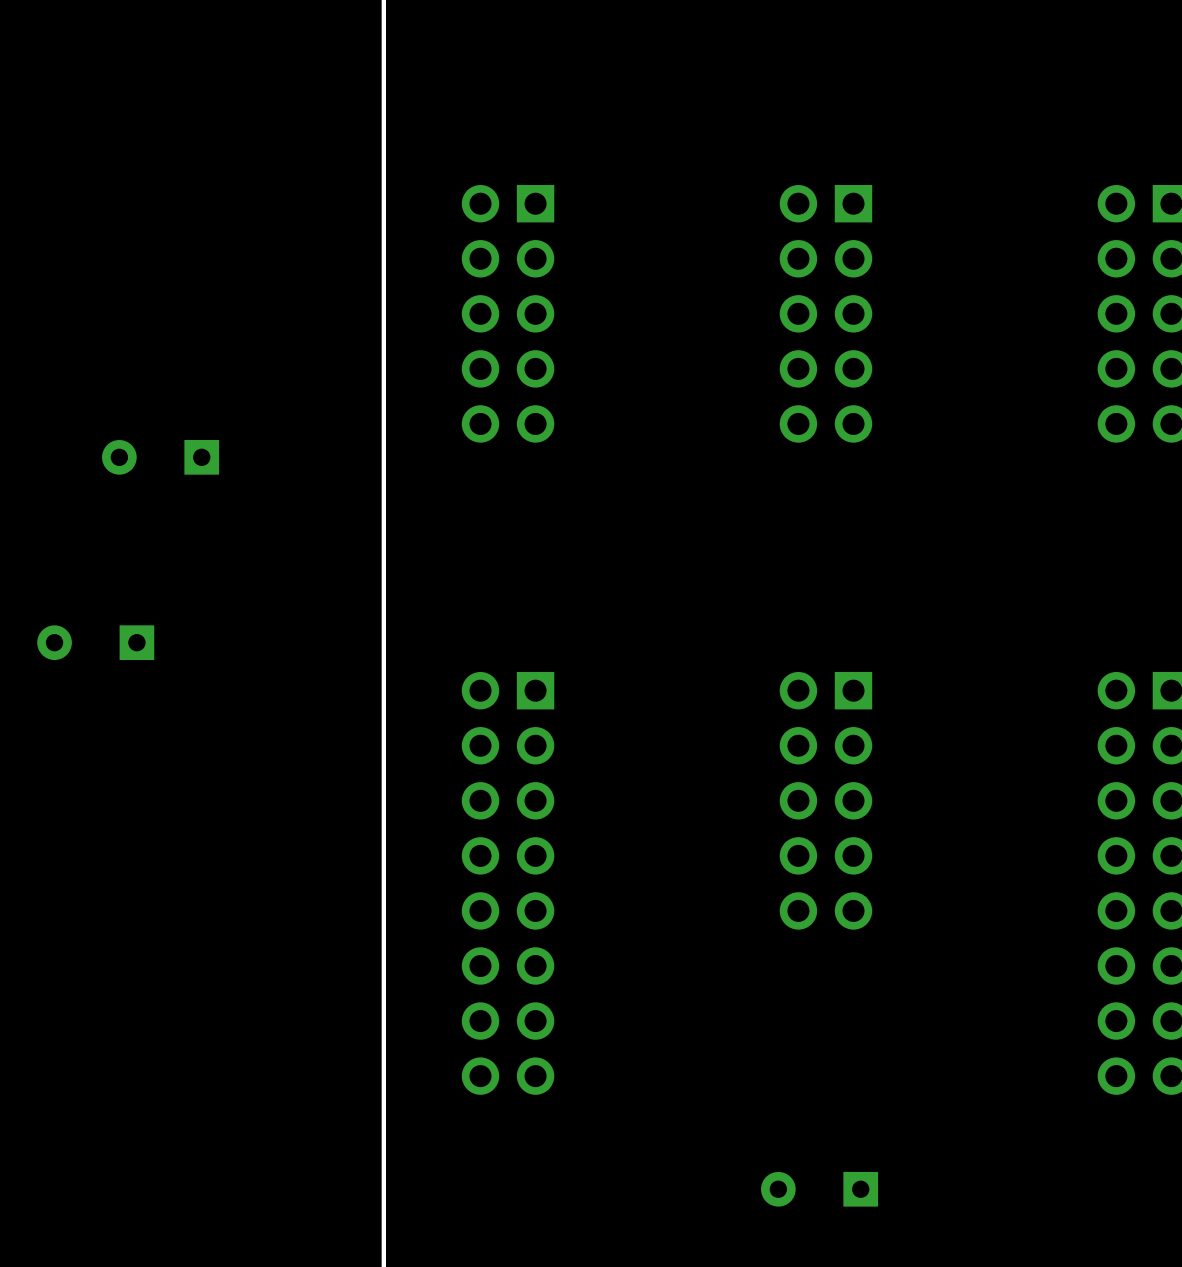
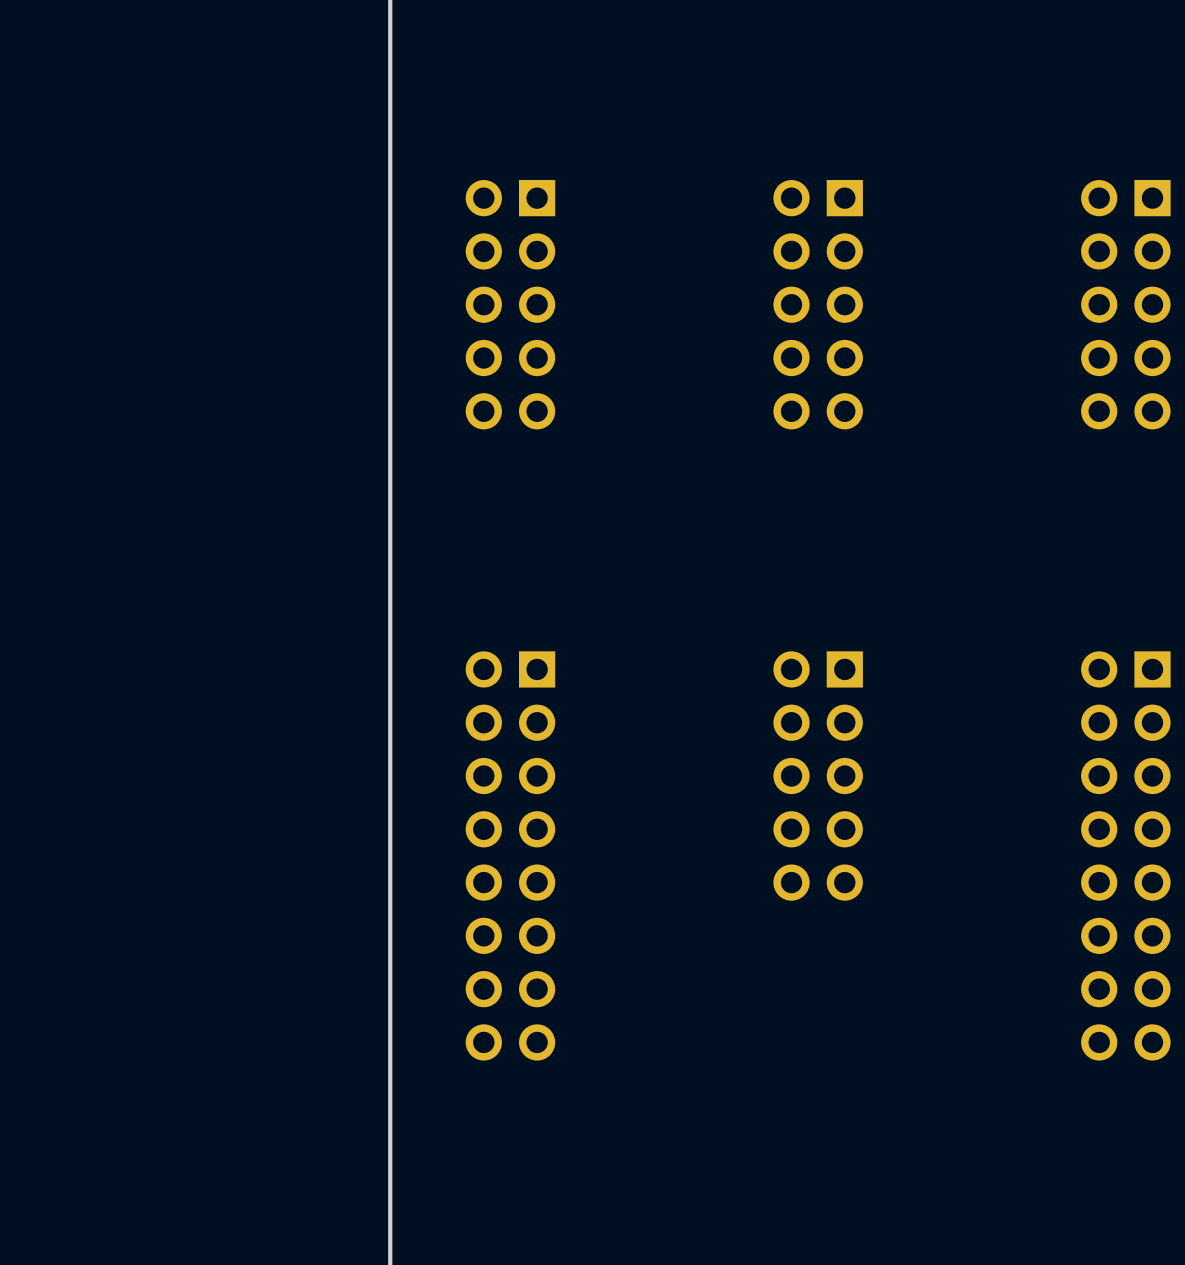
part: (160, 457) -> none
part: (95, 642) -> none
part: (819, 1189) -> none

